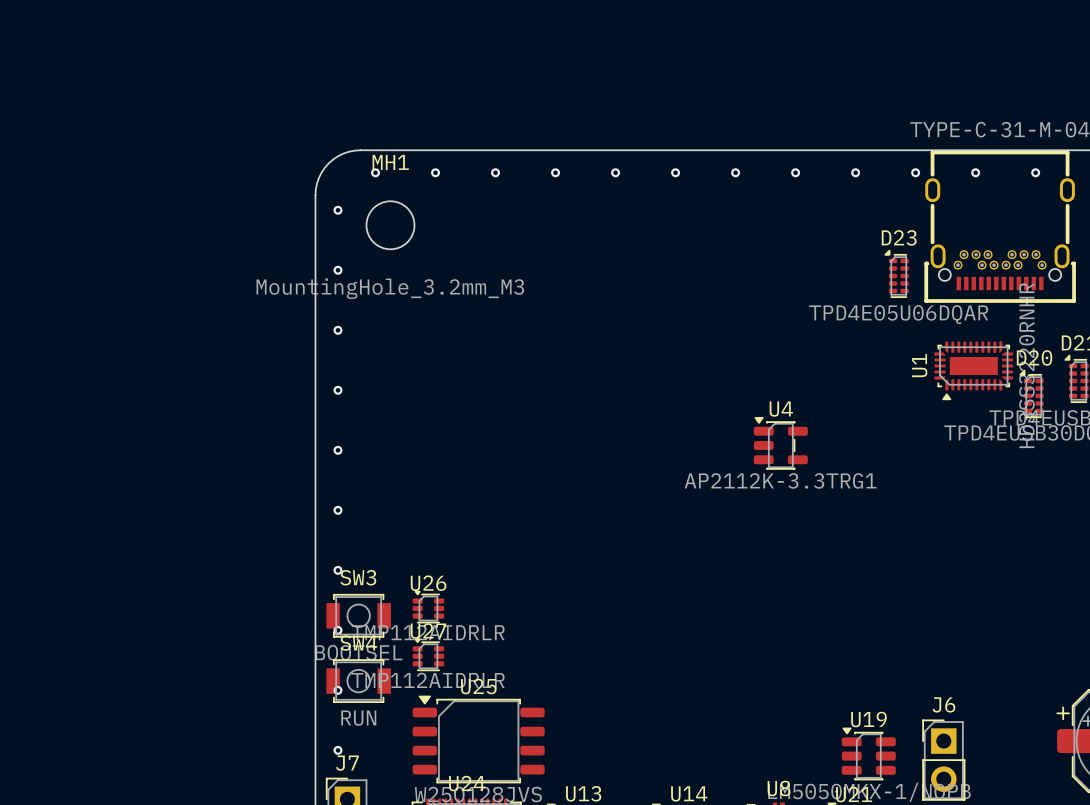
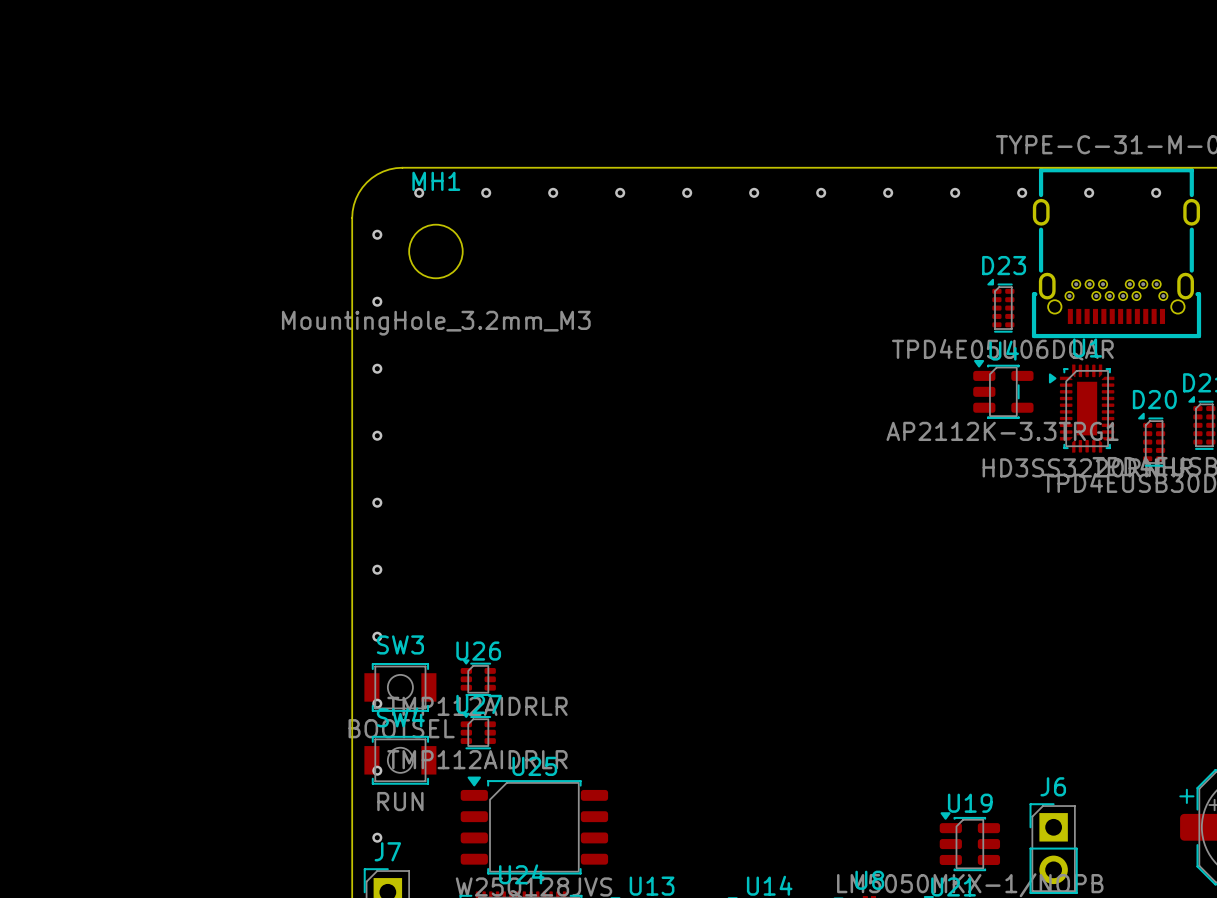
U1 rotation: 0° (973, 370) -> 90° clockwise (1081, 408)
U4 position: (780, 443) -> (1003, 389)

